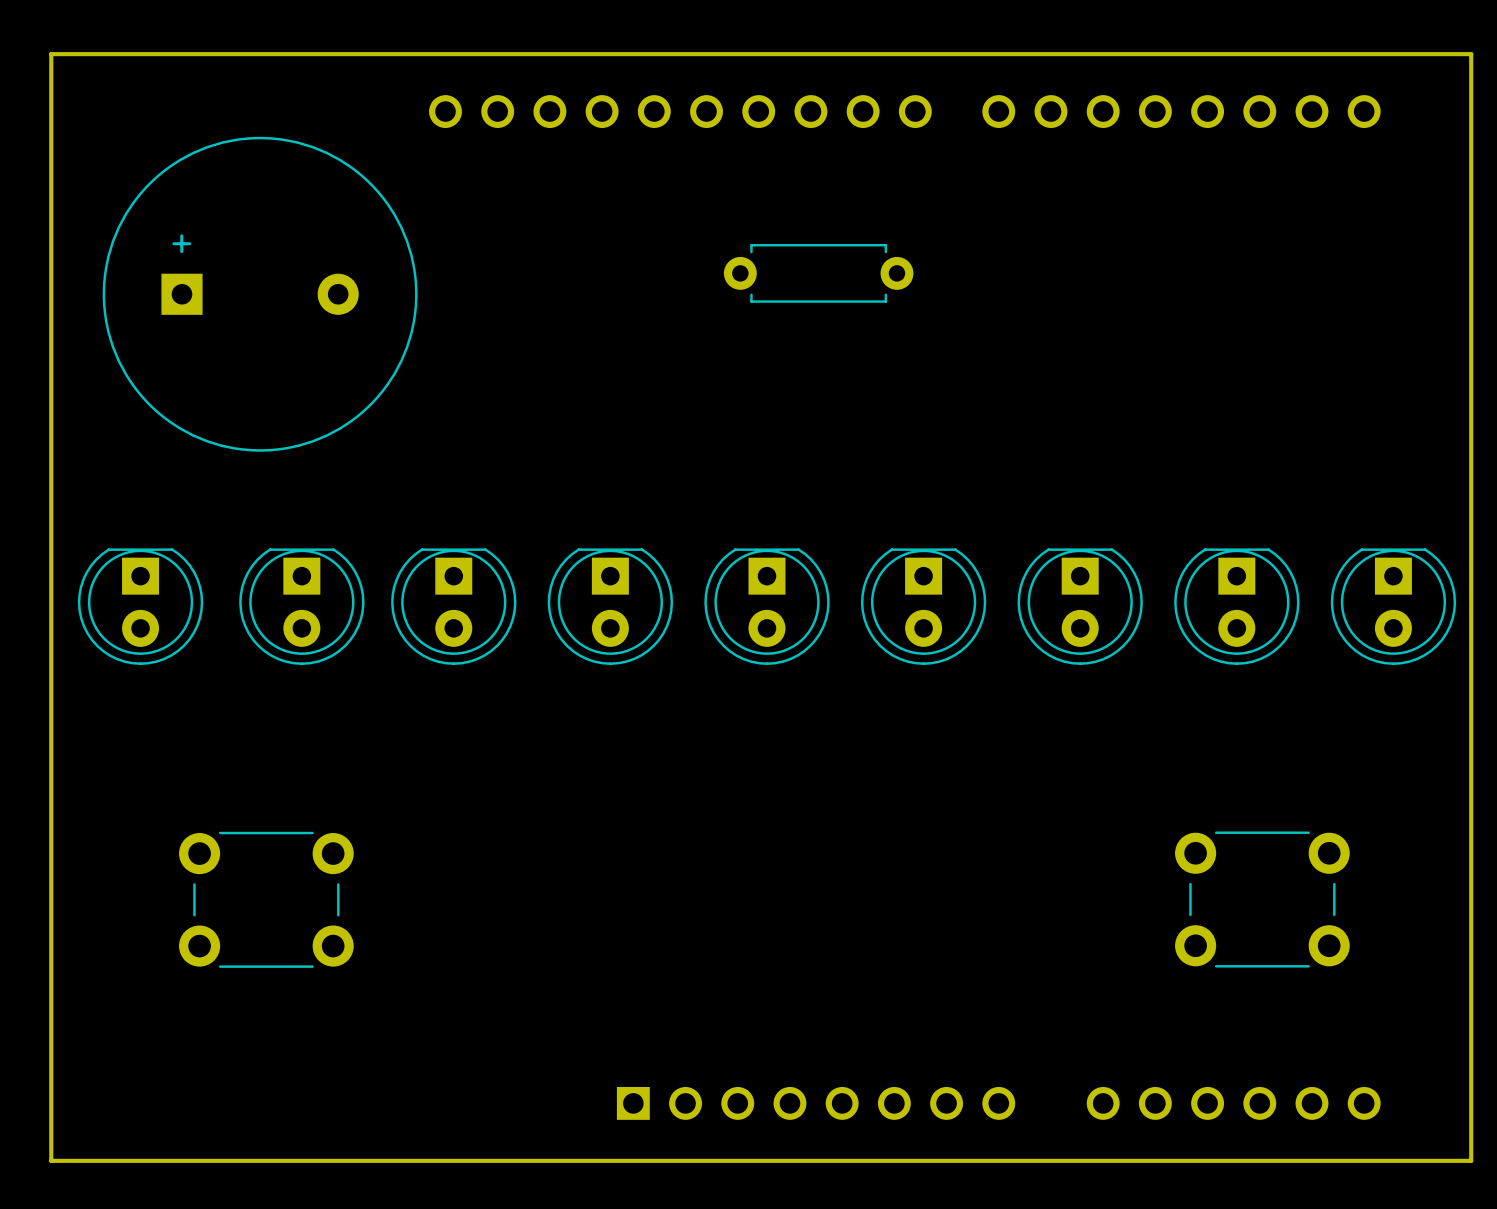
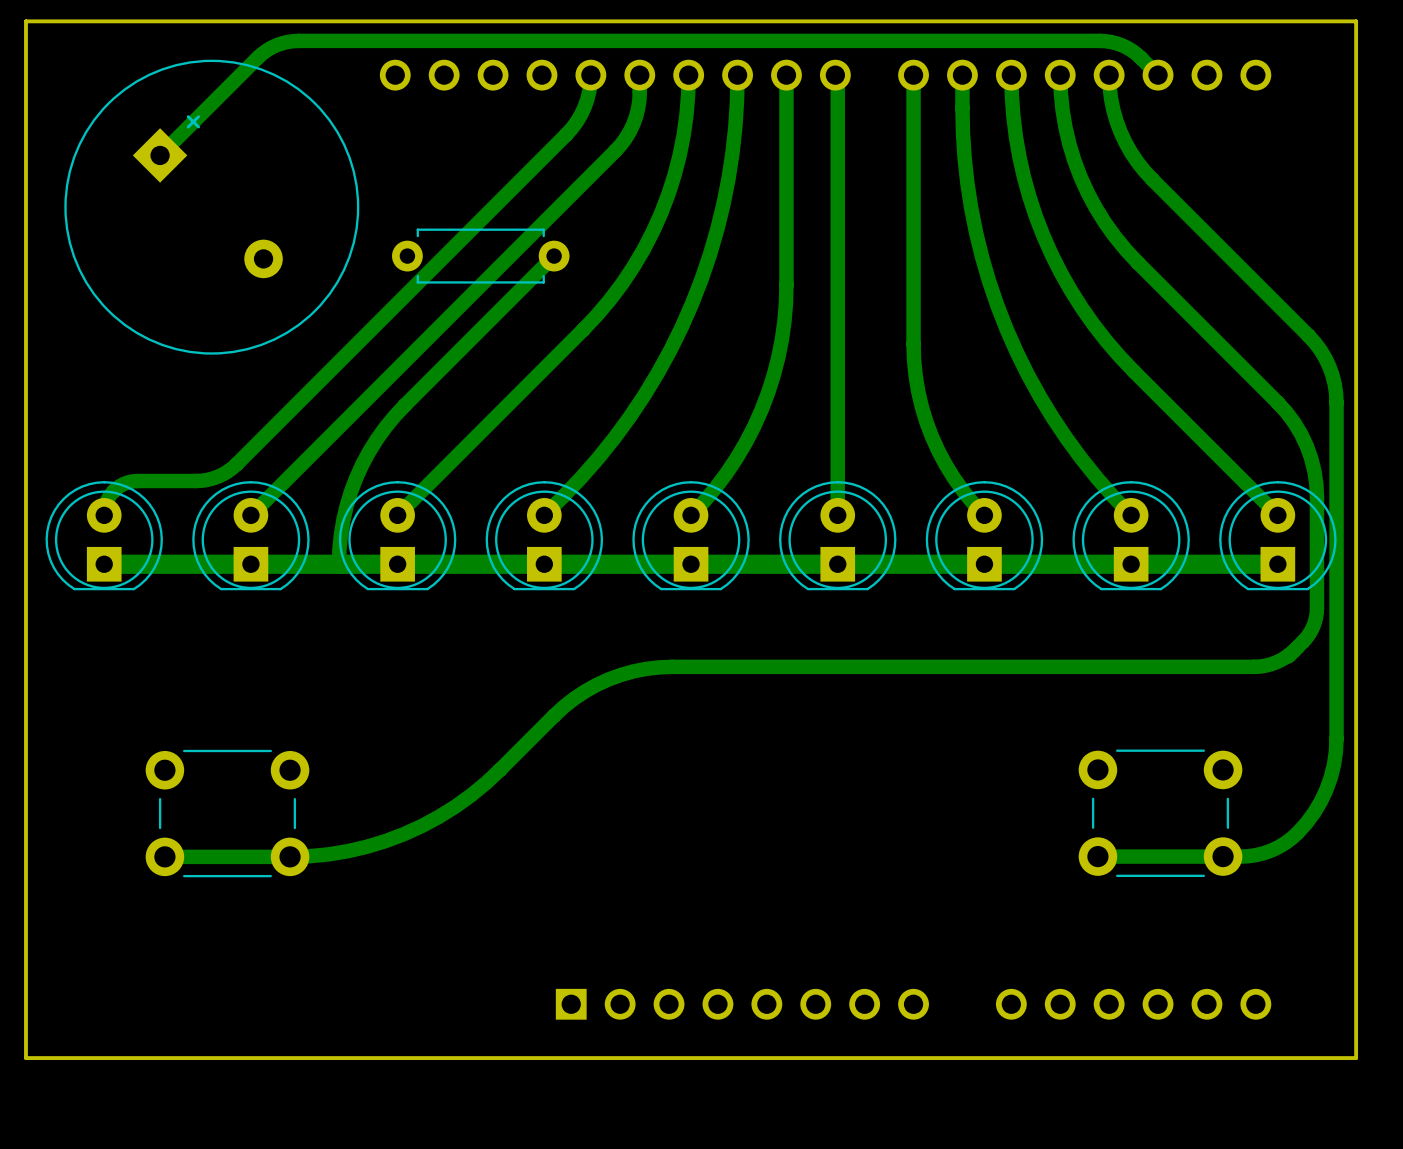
bottom track: none -> (590, 75) (589, 91) (584, 107) (576, 121) (566, 134) (232, 467) (218, 476) (201, 480) (137, 481) (124, 483) (116, 488) (108, 497) (104, 515)
bottom track: none -> (639, 75) (639, 100) (636, 116) (629, 131) (620, 144) (250, 515)
bottom track: none -> (688, 75) (686, 115) (674, 174) (653, 231) (633, 266) (610, 299) (583, 329) (397, 515)
bottom track: none -> (737, 75) (732, 152) (723, 204) (709, 254) (692, 303) (657, 373) (629, 417) (598, 458) (544, 515)
bottom track: none -> (786, 75) (785, 303) (778, 357) (761, 409) (745, 442) (726, 473) (691, 515)
bottom track: none -> (835, 75) (837, 80) (837, 515)
bottom track: none -> (913, 75) (913, 344) (915, 375) (921, 406) (938, 451) (963, 491) (984, 515)
bottom track: none -> (962, 75) (963, 133) (967, 183) (976, 232) (997, 305) (1016, 351) (1052, 417) (1097, 478) (1131, 515)
bottom track: none -> (1011, 75) (1015, 136) (1029, 196) (1051, 254) (1071, 290) (1093, 324) (1119, 356) (1277, 515)
bottom track: none -> (1060, 75) (1065, 126) (1074, 160) (1087, 192) (1105, 222) (1138, 262) (1286, 412) (1306, 446) (1316, 484) (1316, 612) (1309, 634) (1287, 656)
bottom track: none -> (1109, 75) (1110, 98) (1116, 120) (1125, 142) (1137, 161) (1152, 179) (1308, 336) (1320, 350) (1332, 375) (1336, 402) (1336, 738) (1330, 777) (1320, 801) (1297, 833) (1278, 847) (1264, 853) (1248, 856) (1097, 856)
bottom track: none -> (1158, 75) (1136, 54) (1127, 47) (1111, 42) (1099, 40) (292, 41) (276, 45) (261, 54) (160, 155)
part: none -> (211, 207)
part position: (818, 273) -> (480, 256)
part: (260, 294) -> none
bottom track: none -> (554, 256) (404, 405) (376, 439) (362, 464) (350, 492) (343, 520) (338, 564)
part rotation: 0° (140, 606) -> 180° (104, 535)
part rotation: 0° (301, 606) -> 180° (250, 535)
part rotation: 0° (453, 606) -> 180° (397, 535)
part rotation: 0° (610, 606) -> 180° (544, 535)
part rotation: 0° (766, 606) -> 180° (691, 535)
part rotation: 0° (923, 606) -> 180° (837, 535)
part rotation: 0° (1080, 606) -> 180° (984, 535)
part rotation: 0° (1236, 606) -> 180° (1131, 535)
part rotation: 0° (1393, 606) -> 180° (1277, 535)
bottom track: none -> (104, 564) (1277, 564)
bottom track: none -> (1294, 649) (1276, 662) (1253, 666) (672, 666) (646, 668) (608, 679) (574, 698) (470, 795) (438, 817) (403, 834) (366, 846) (309, 856) (164, 856)

